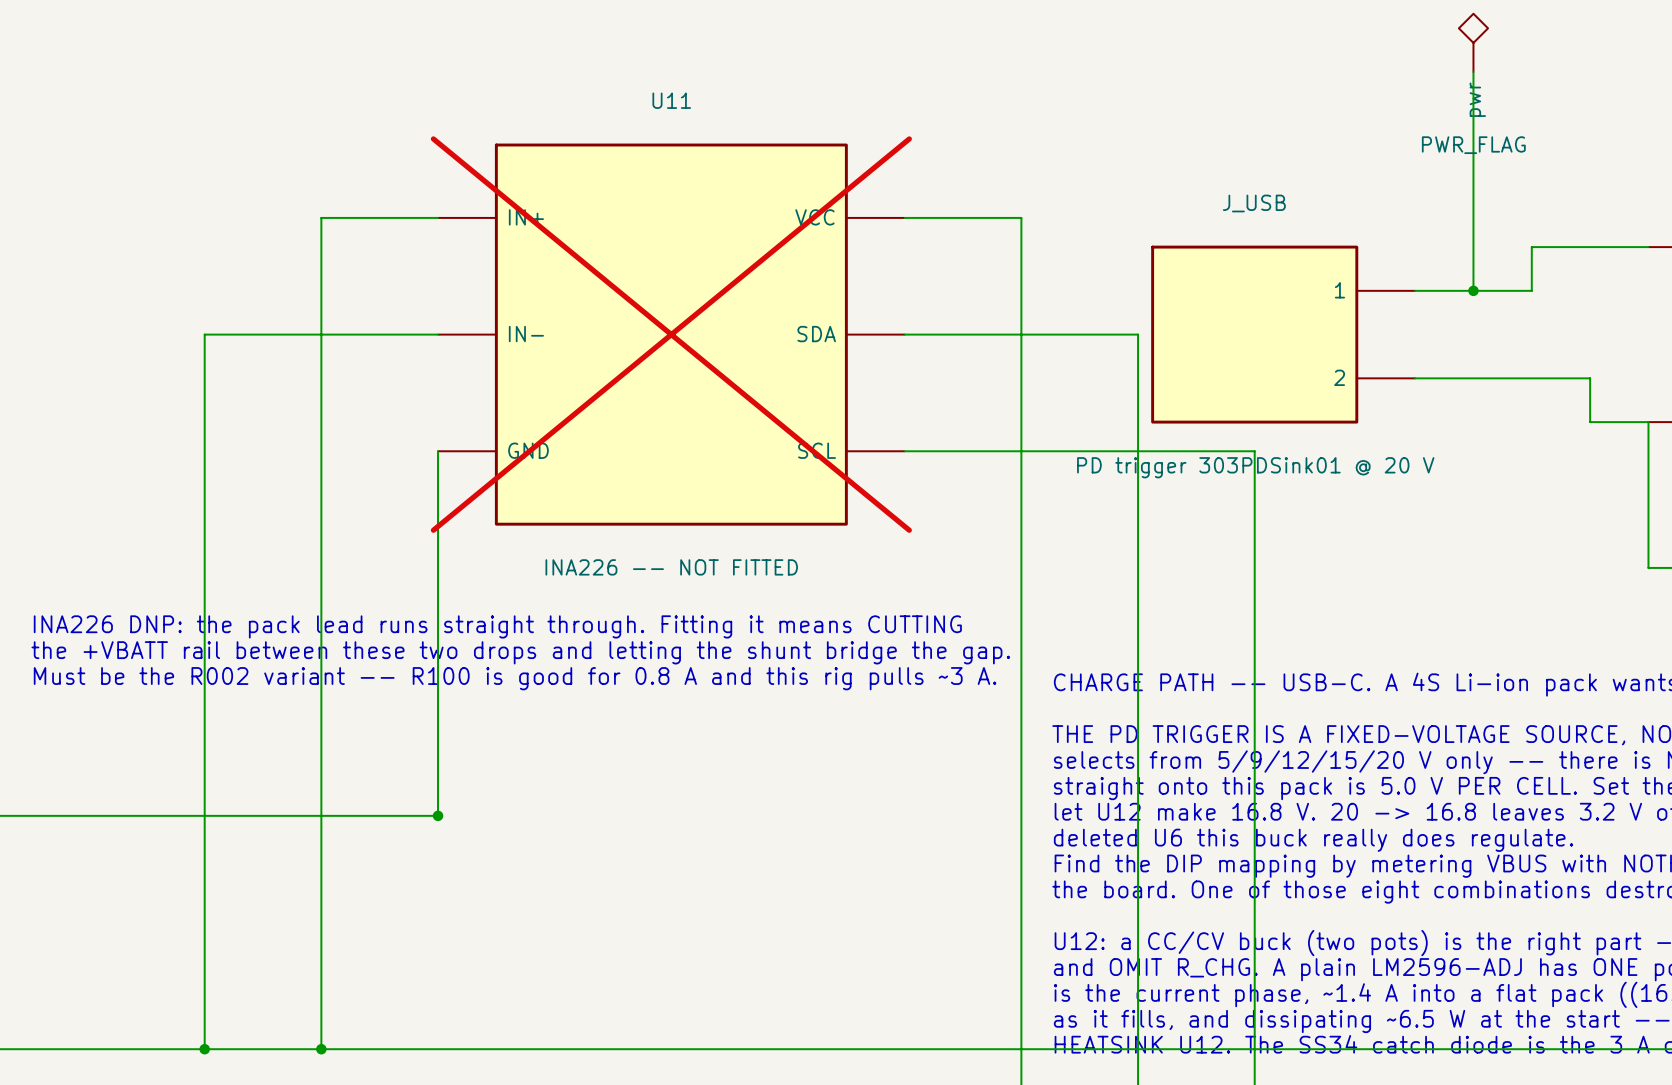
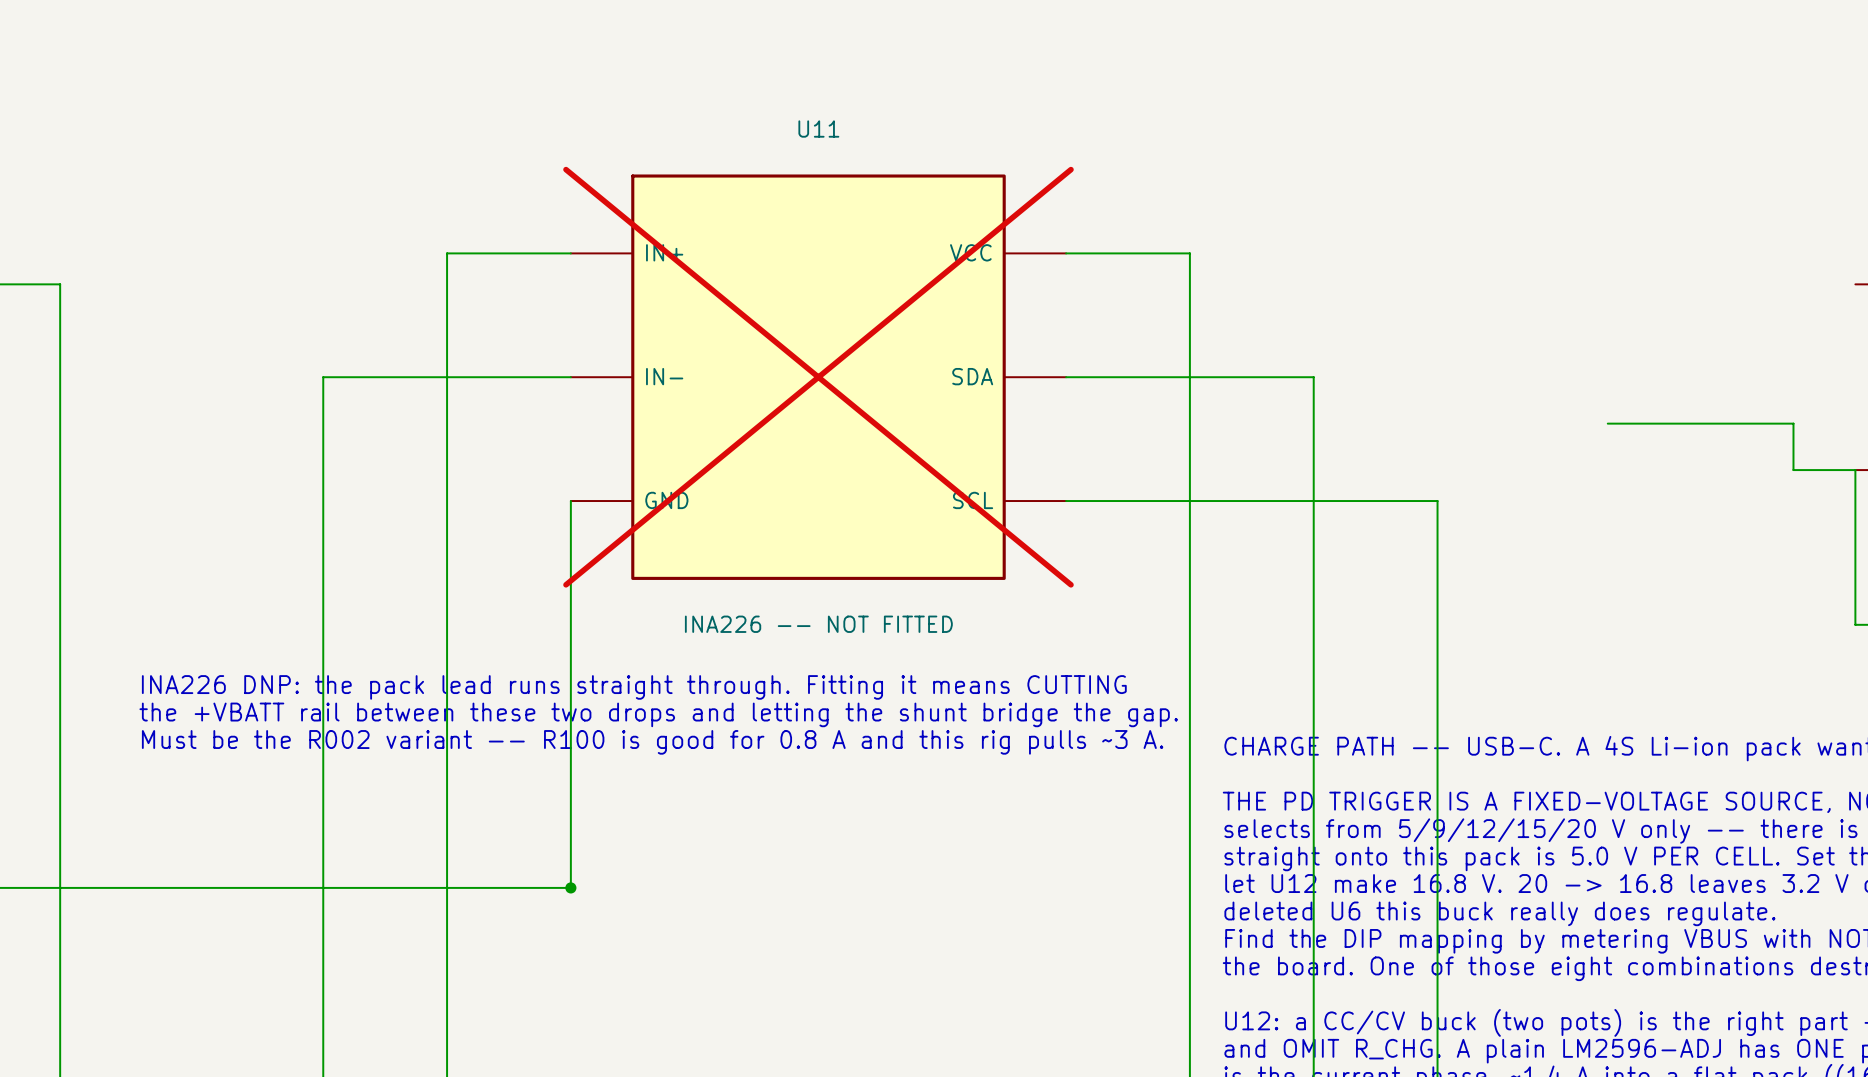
power symbol: PWR_FLAG (1473, 42) -> none
wire: (1473, 72) (1473, 290) -> none
wire: (1648, 247) (1531, 247) (1531, 290) (1415, 290) -> none
junction: (1473, 290) -> none
J_USB: PD trigger 303PDSink01 @ 20 V (1283, 334) -> none

